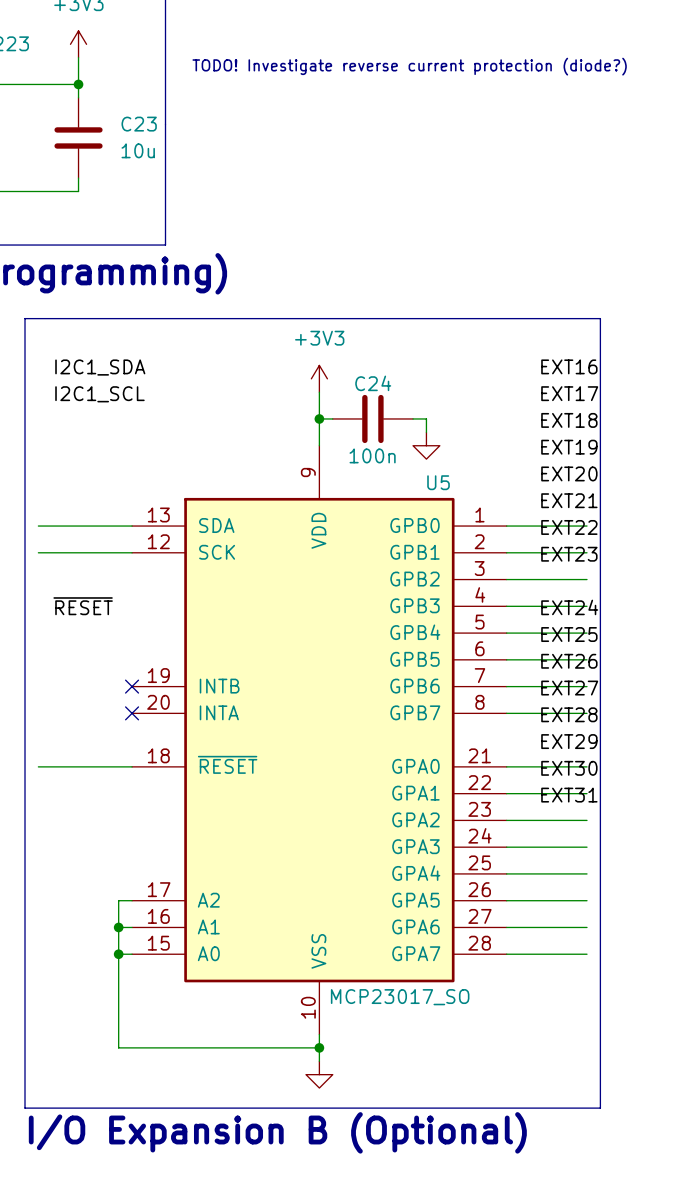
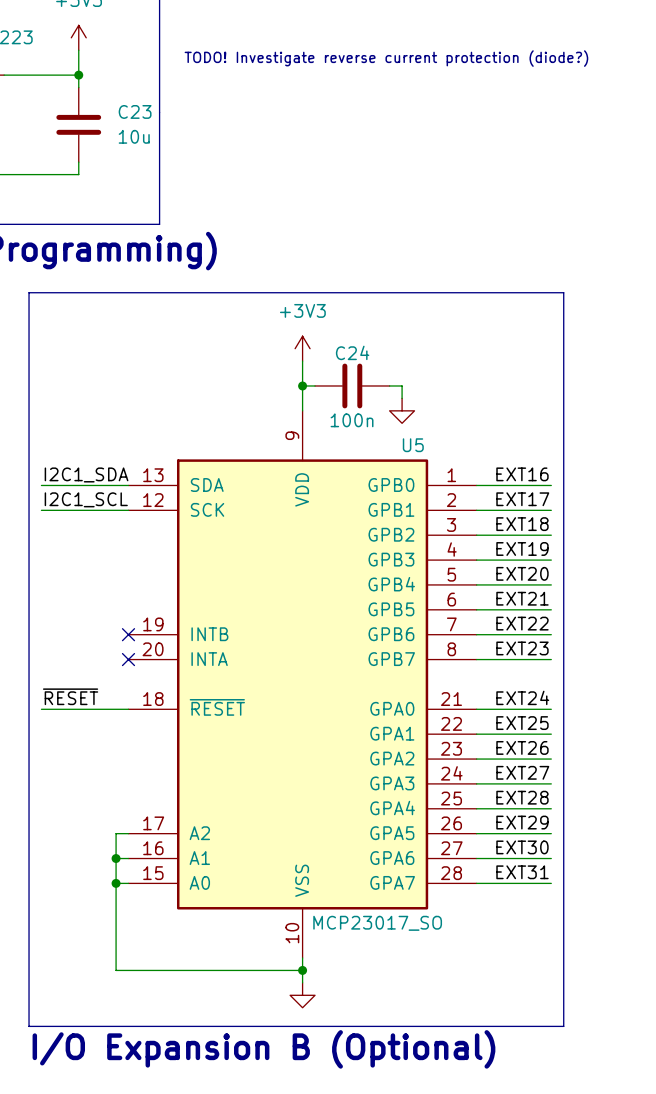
label position: EXT16 (569, 366) -> EXT16 (522, 474)
label position: I2C1_SDA (100, 367) -> I2C1_SDA (86, 474)
label position: EXT17 (569, 393) -> EXT17 (522, 499)
label position: I2C1_SCL (99, 394) -> I2C1_SCL (86, 499)
label position: EXT18 (569, 420) -> EXT18 (522, 524)
label position: EXT19 (569, 447) -> EXT19 (522, 548)
label position: EXT20 (569, 473) -> EXT20 (522, 573)
label position: EXT21 (569, 500) -> EXT21 (522, 598)
label position: EXT22 (569, 527) -> EXT22 (522, 623)
label position: EXT23 (569, 554) -> EXT23 (522, 648)
label position: ~{RESET} (83, 606) -> ~{RESET} (70, 696)
label position: EXT24 (569, 607) -> EXT24 (522, 697)
label position: EXT25 (569, 634) -> EXT25 (522, 723)
label position: EXT26 (569, 661) -> EXT26 (522, 747)
label position: EXT27 (569, 688) -> EXT27 (522, 772)
label position: EXT28 (569, 714) -> EXT28 (522, 797)
label position: EXT29 (569, 741) -> EXT29 (522, 822)
label position: EXT30 (569, 768) -> EXT30 (522, 847)
label position: EXT31 (569, 795) -> EXT31 (522, 872)

